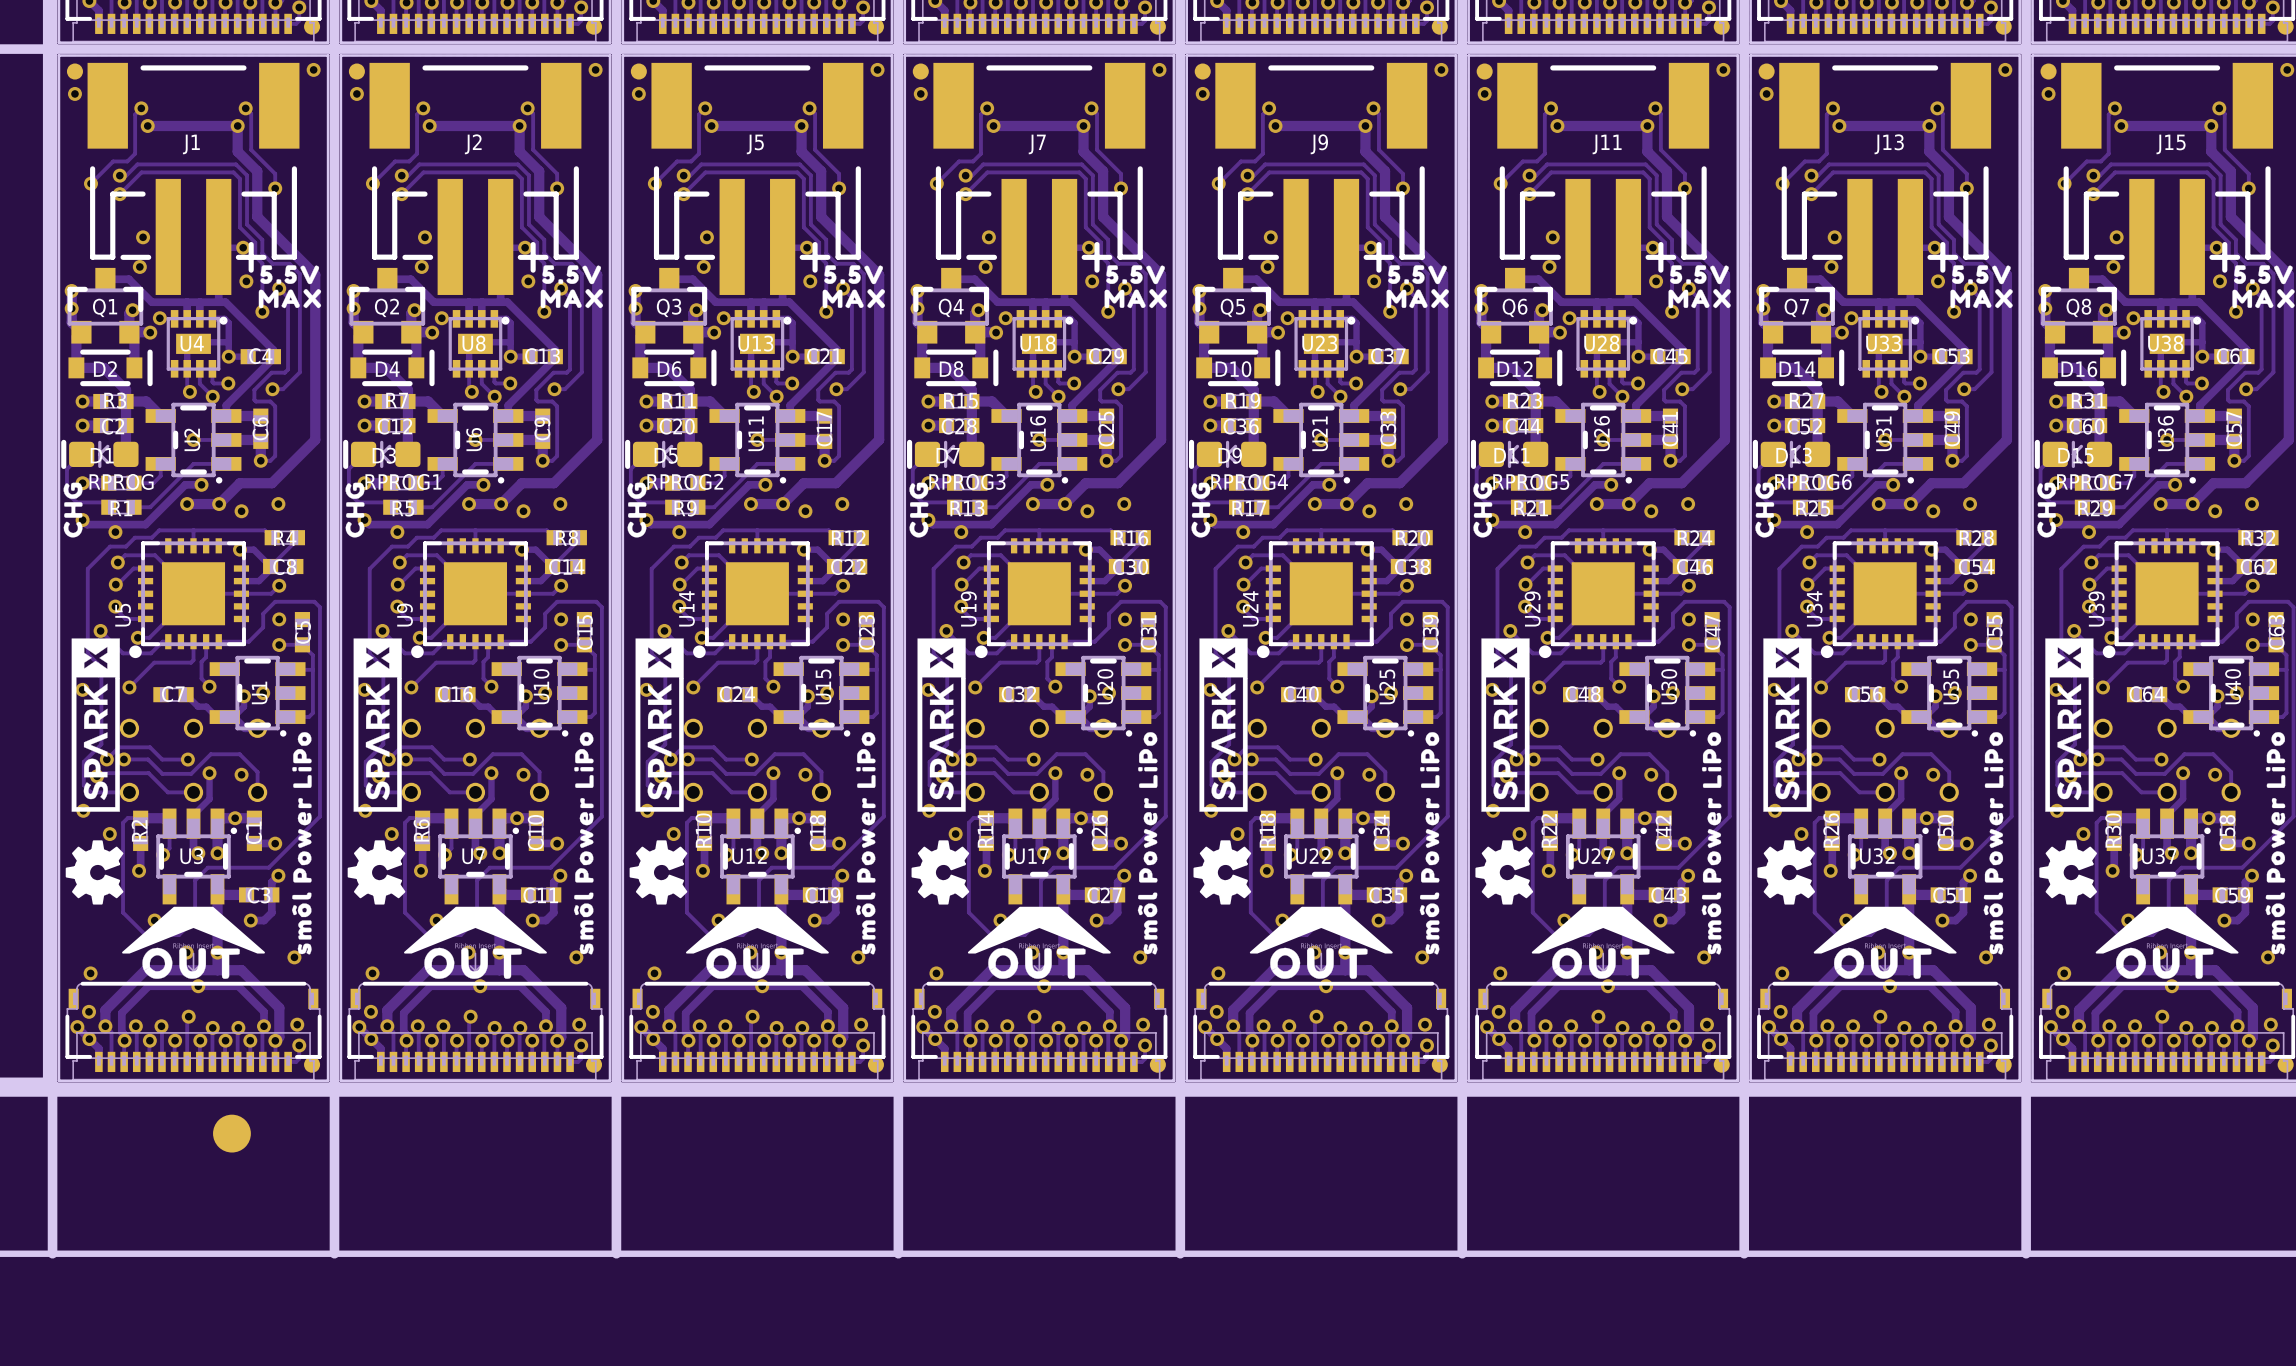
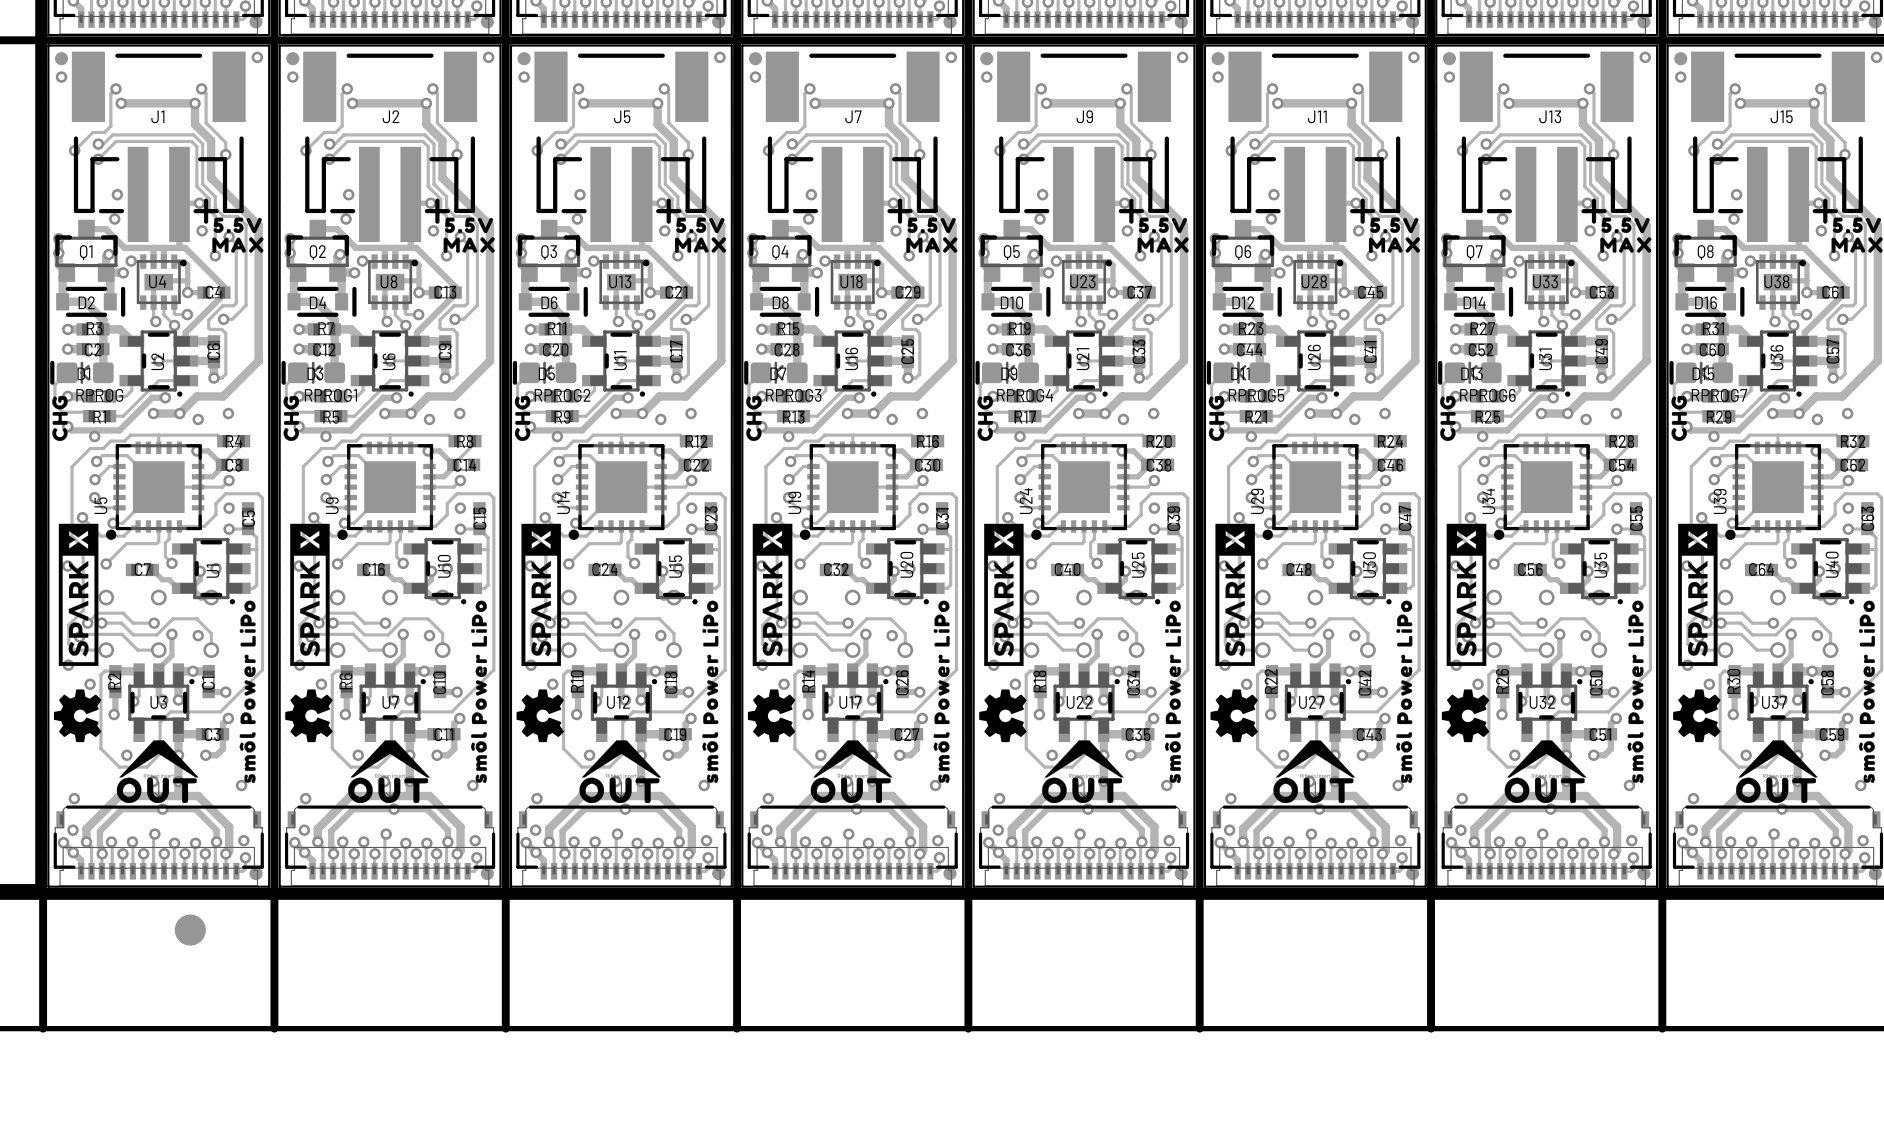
drawing shape: [122, 906, 265, 954] -> [119, 740, 199, 778]
drawing shape: [404, 906, 547, 954] -> [350, 740, 430, 778]
drawing shape: [685, 906, 829, 954] -> [581, 740, 662, 778]
drawing shape: [967, 906, 1111, 954] -> [813, 740, 893, 778]
drawing shape: [1249, 906, 1393, 954] -> [1044, 740, 1124, 778]
drawing shape: [1531, 906, 1675, 954] -> [1275, 740, 1355, 778]
drawing shape: [1813, 906, 1957, 954] -> [1507, 740, 1587, 778]
drawing shape: [2095, 906, 2239, 954] -> [1738, 740, 1818, 778]

